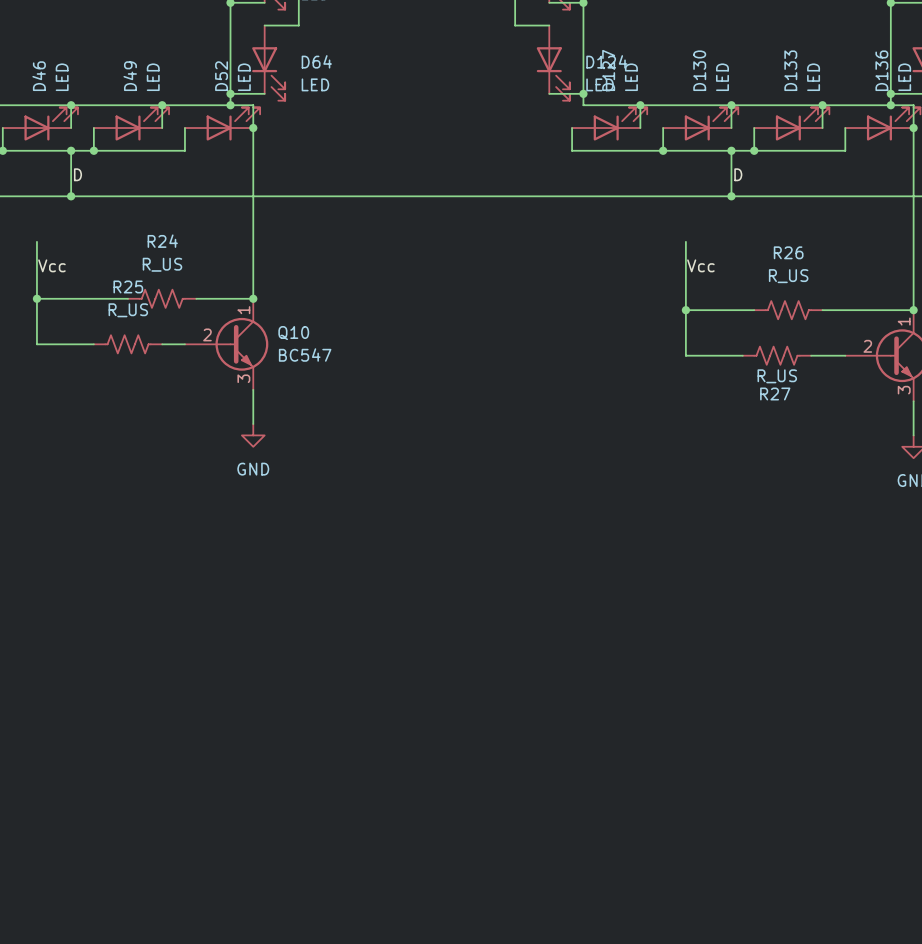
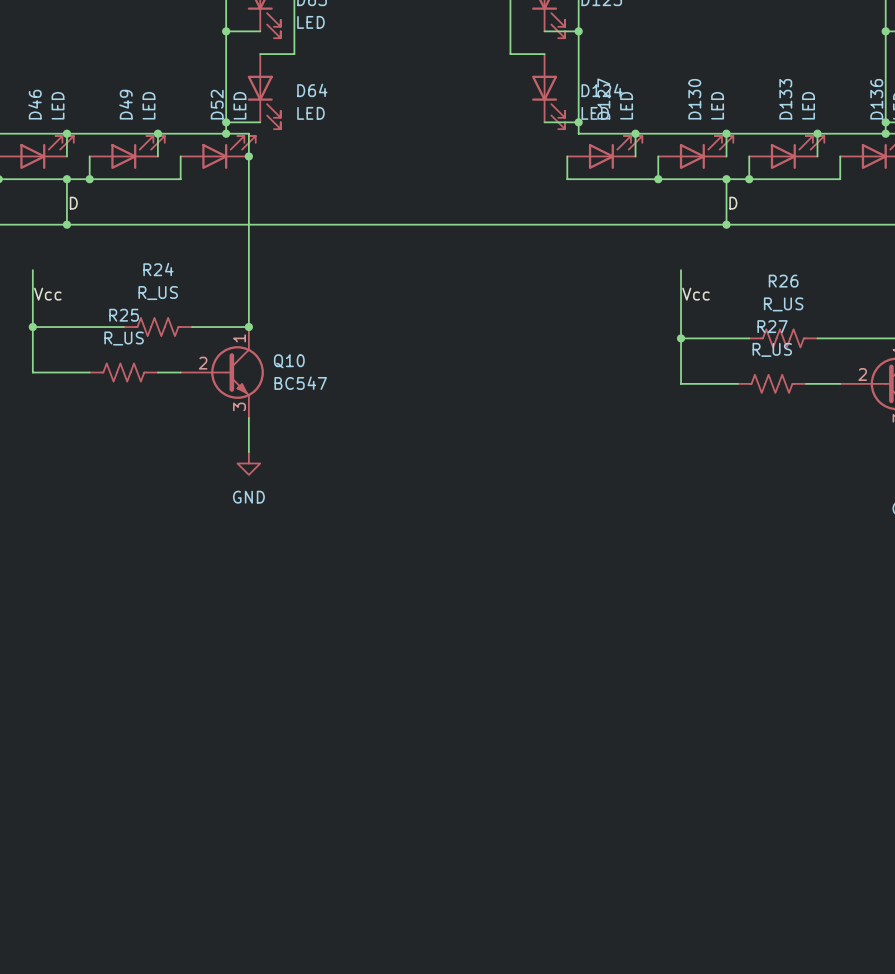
R27 value position: R_US (777, 376) -> R_US (772, 349)
R27 name position: R27 (775, 393) -> R27 (772, 326)

